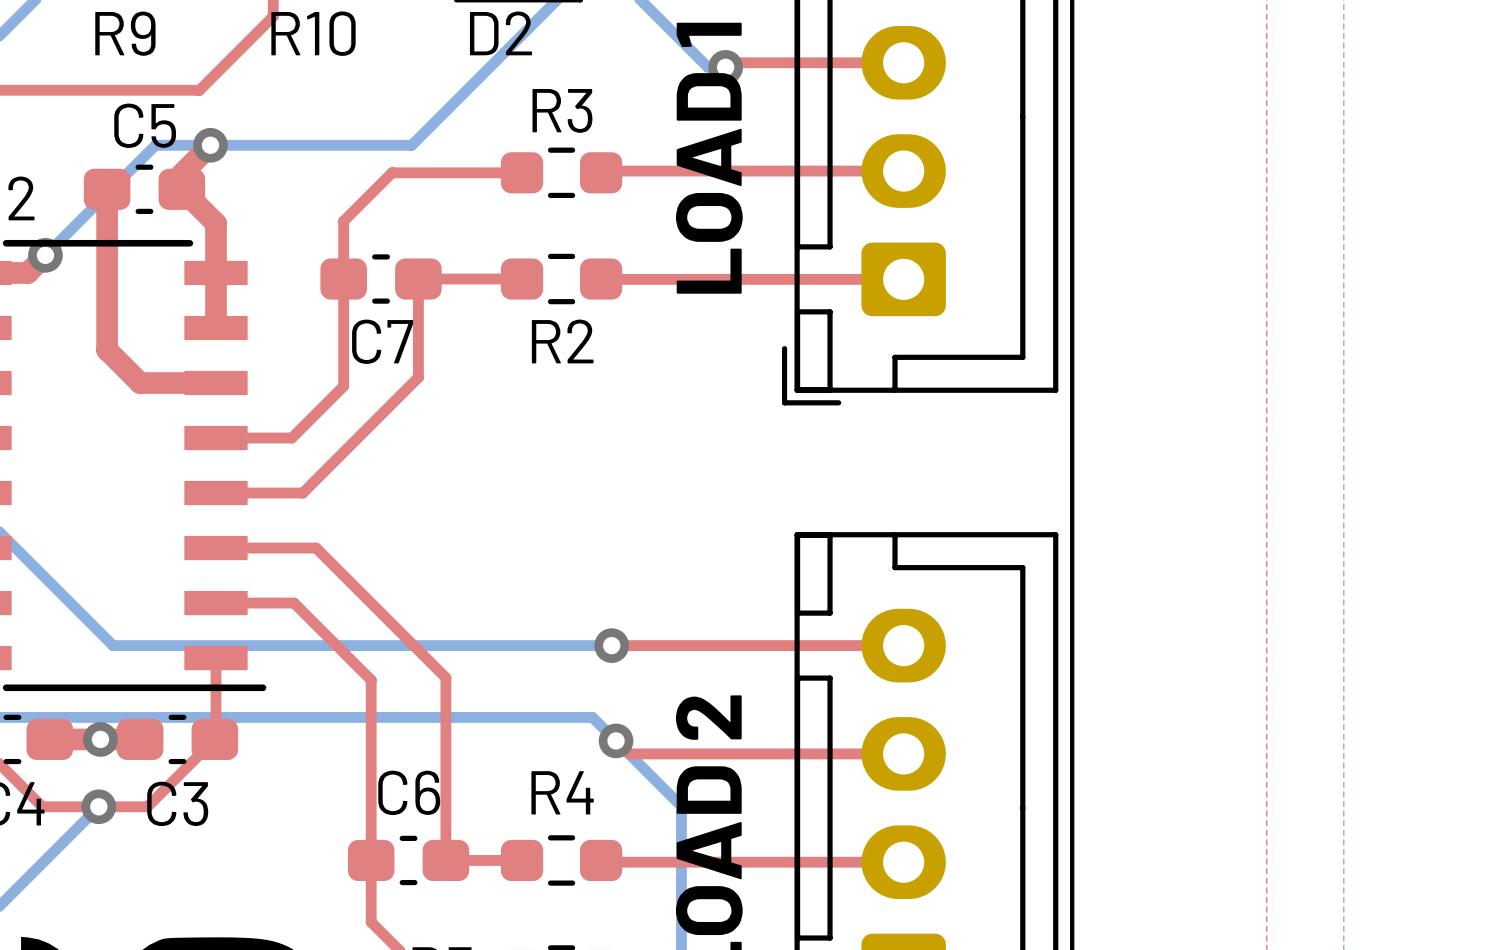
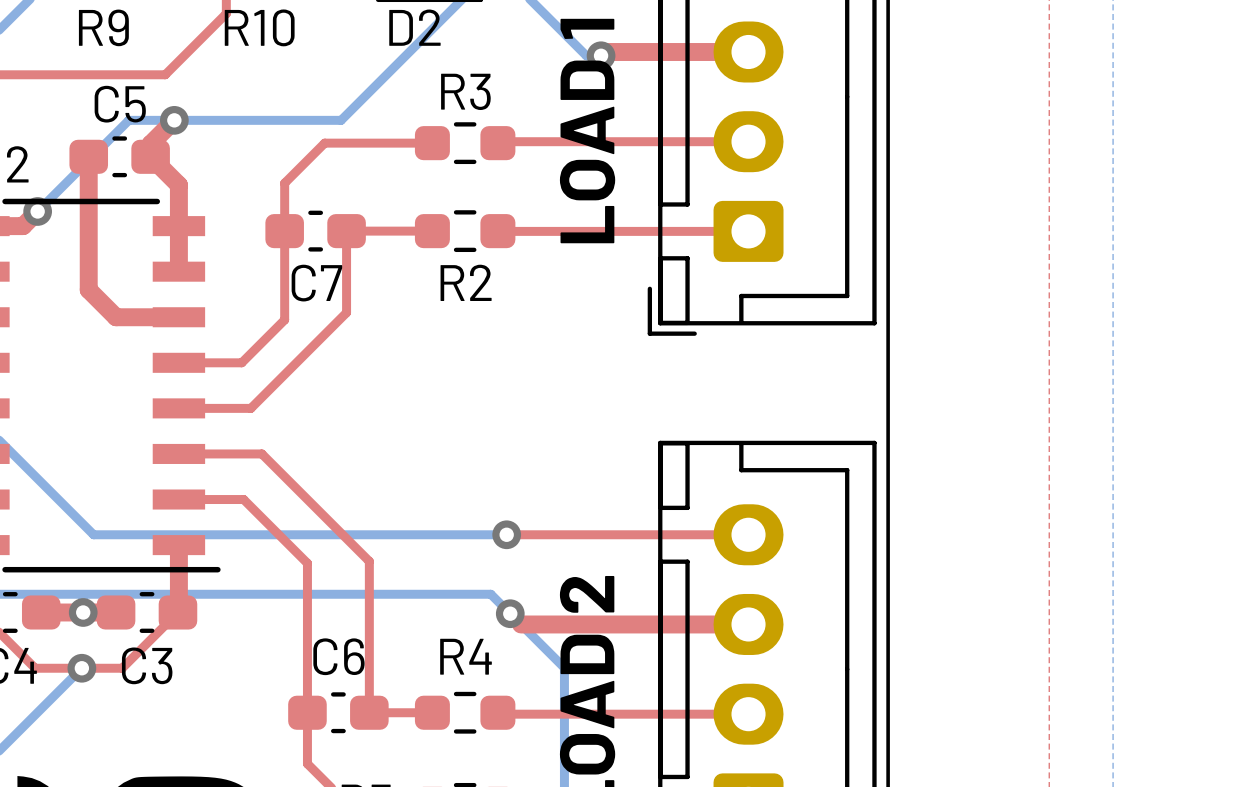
top track width: thin (730, 62) (903, 62) -> thick (604, 52) (748, 52)
top track width: thin (216, 658) (216, 738) -> thick (178, 545) (178, 611)
top track width: thin (629, 753) (903, 753) -> thick (521, 624) (748, 624)

